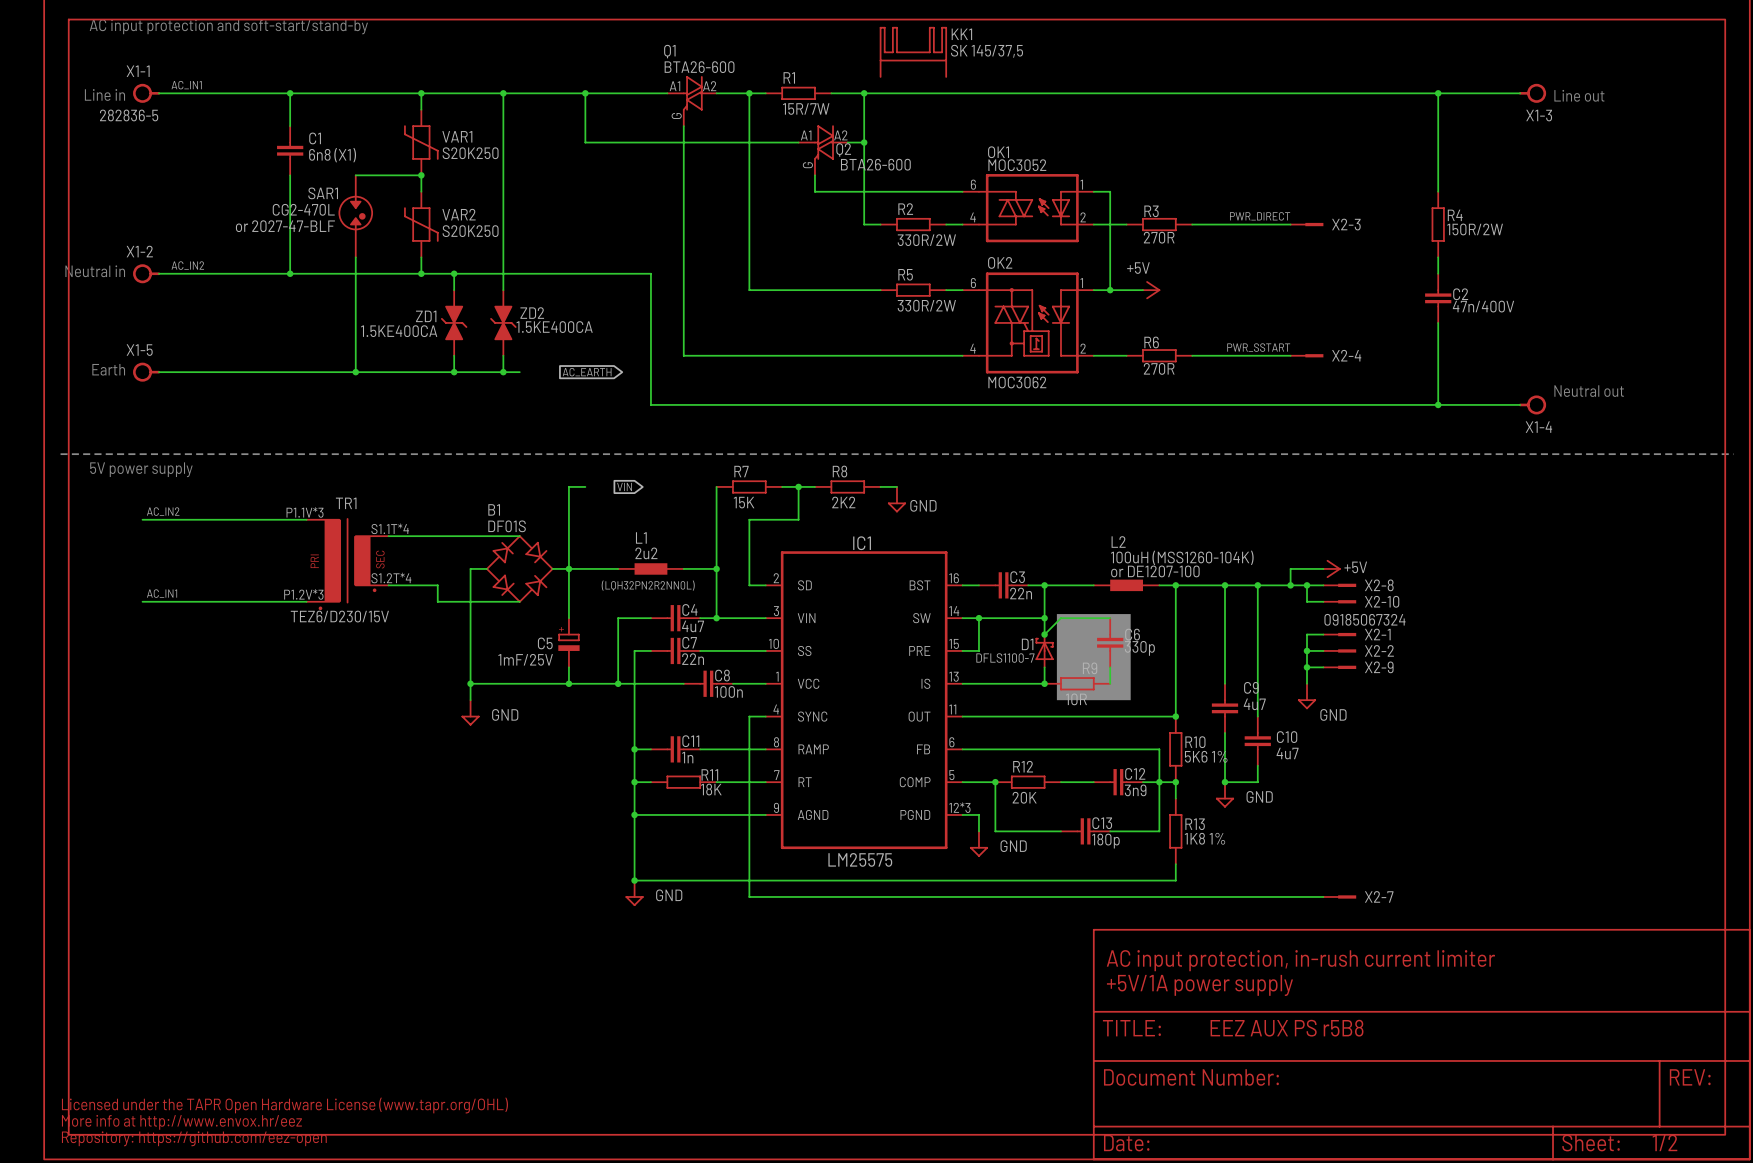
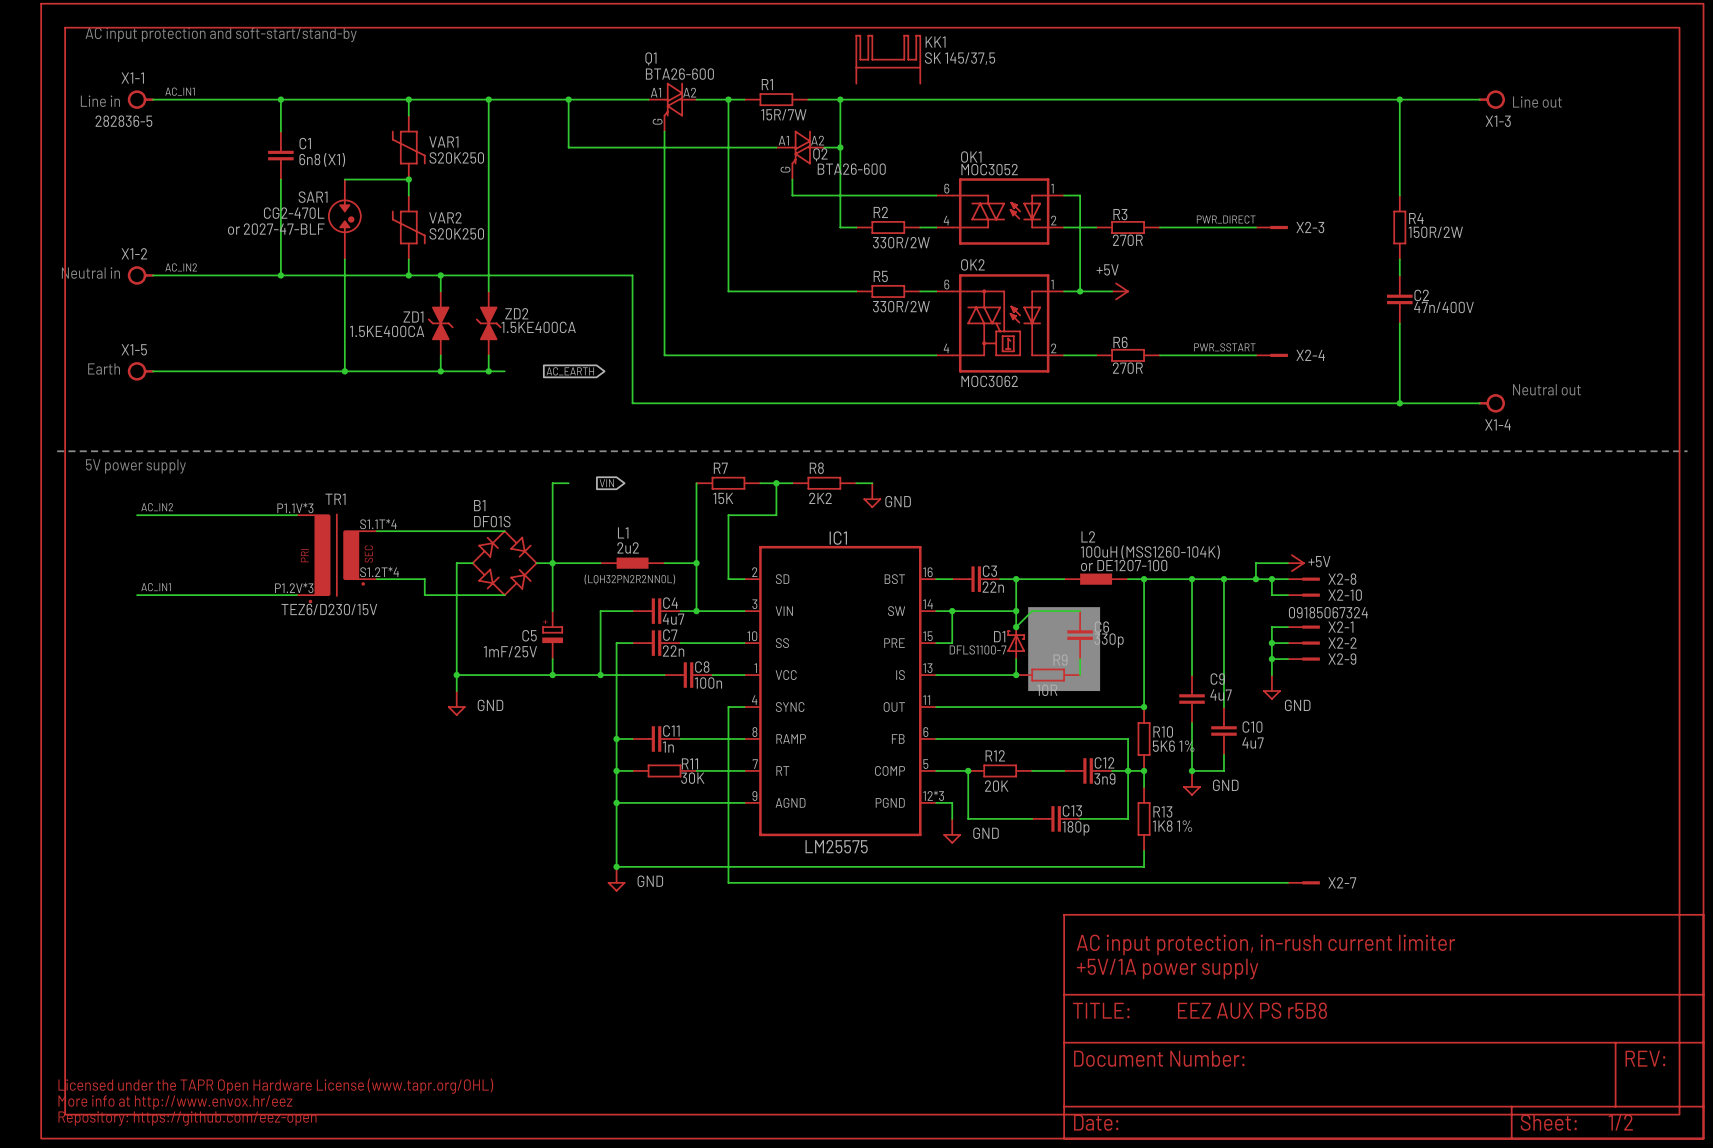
R11 value: 18K (711, 789) -> 30K (692, 778)

